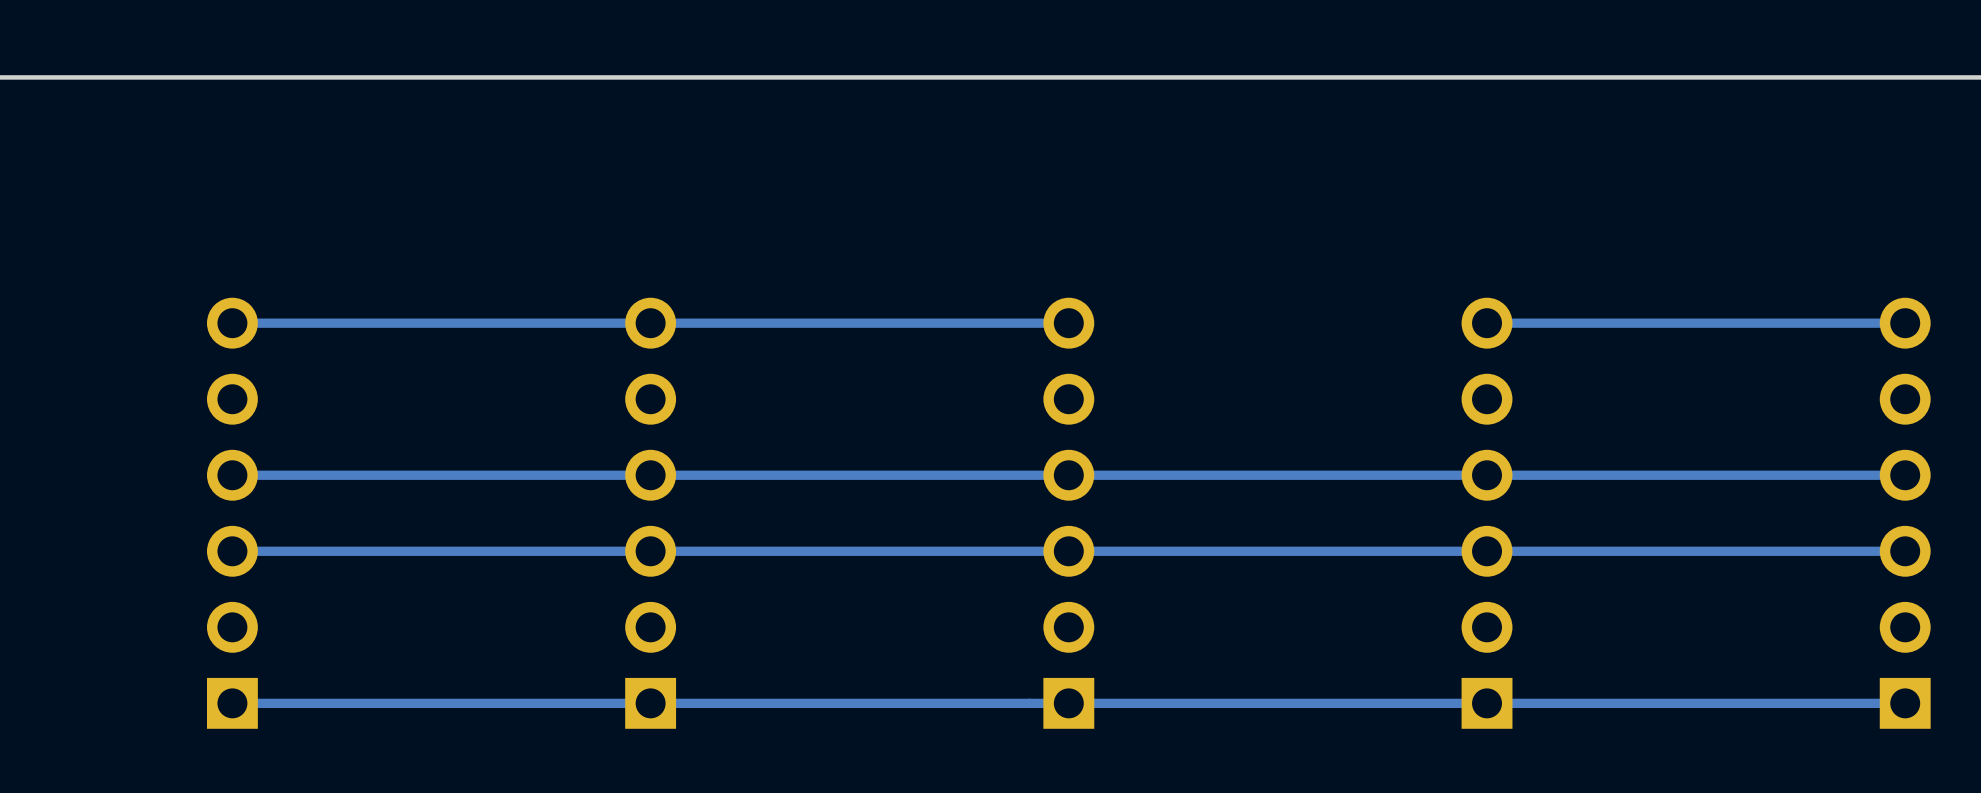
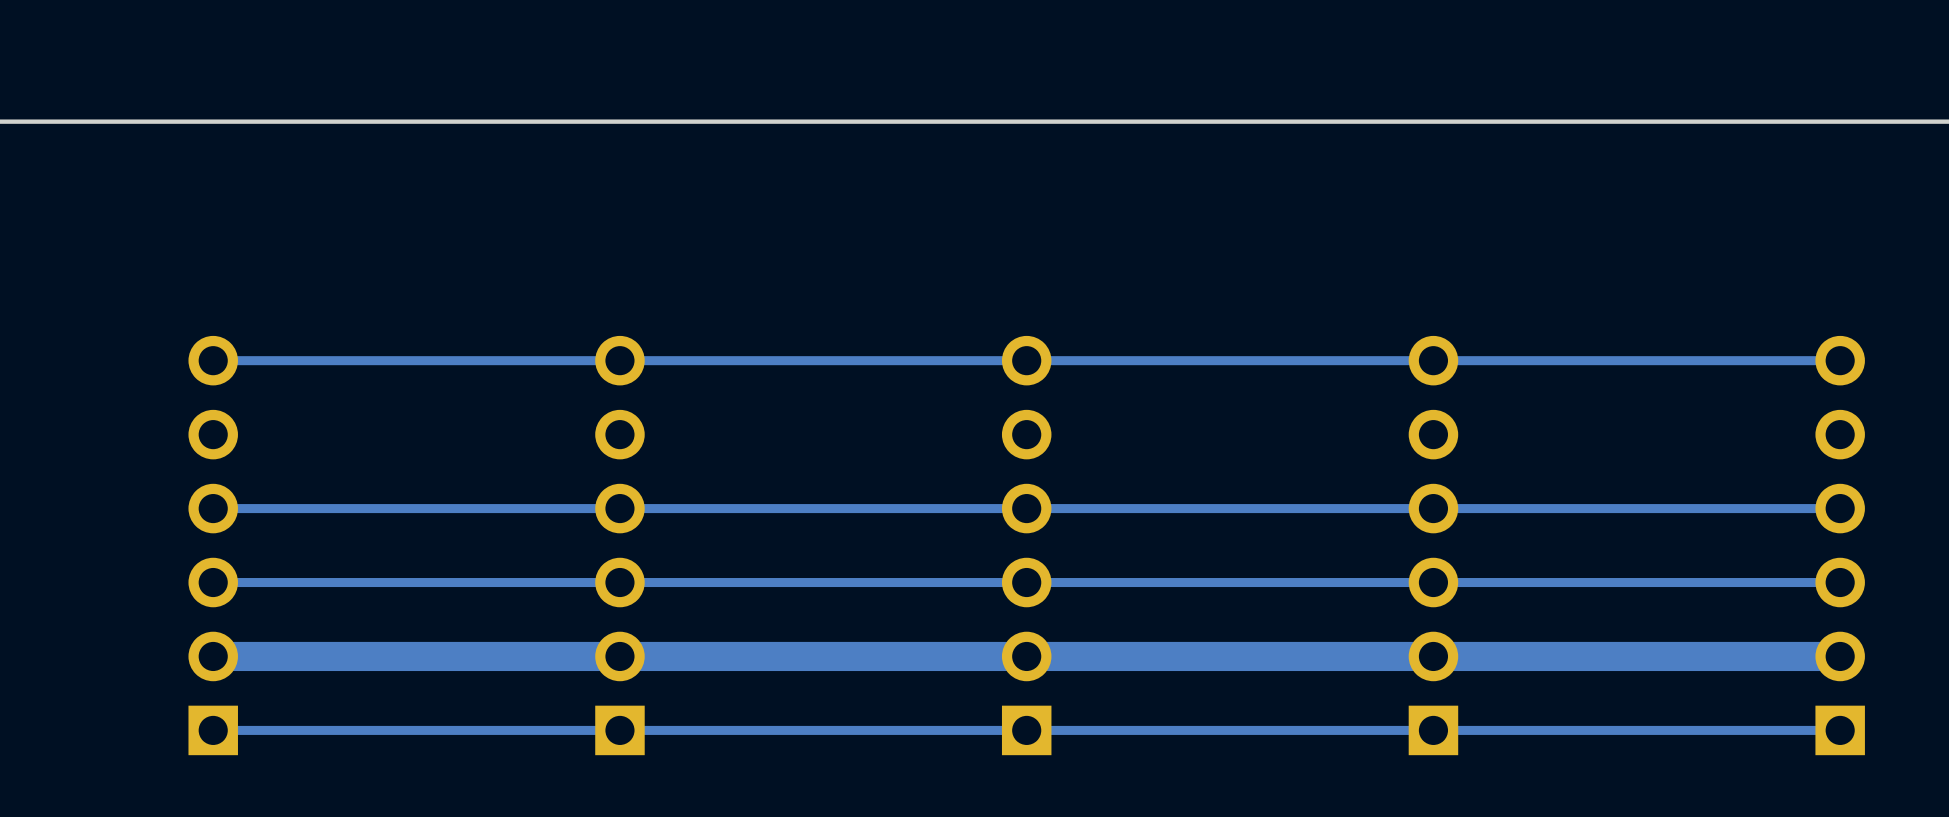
track: none -> (1433, 360) (1026, 360)
track: none -> (1840, 656) (213, 656)

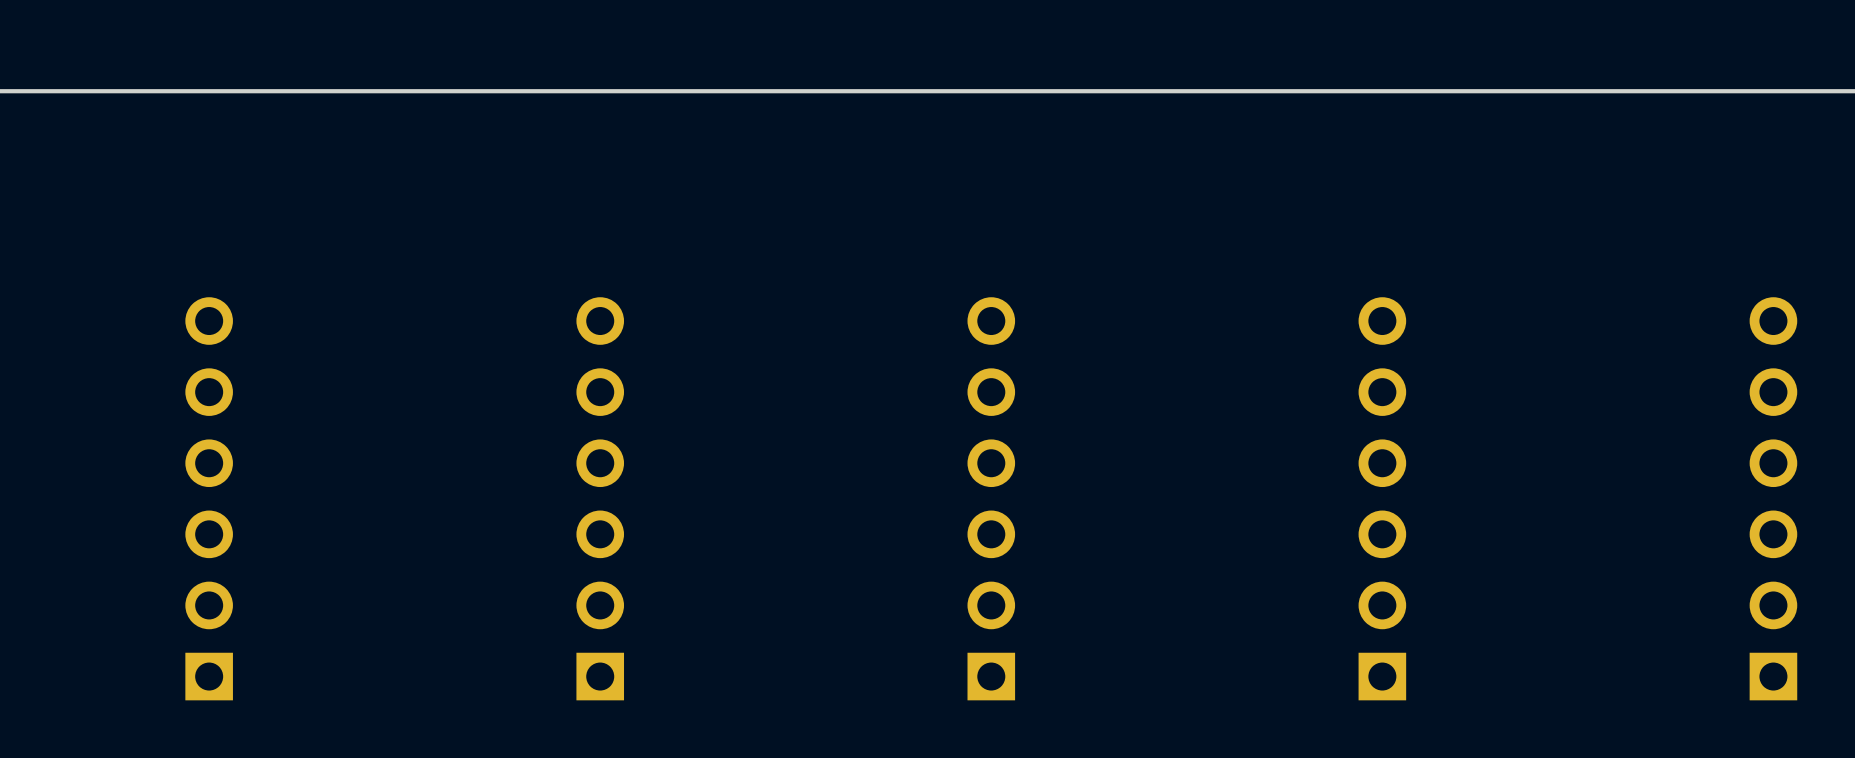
track: (1840, 360) (213, 360) -> none
track: (1840, 508) (213, 508) -> none
track: (1840, 582) (213, 582) -> none
track: (1840, 656) (213, 656) -> none
track: (1840, 730) (213, 730) -> none

